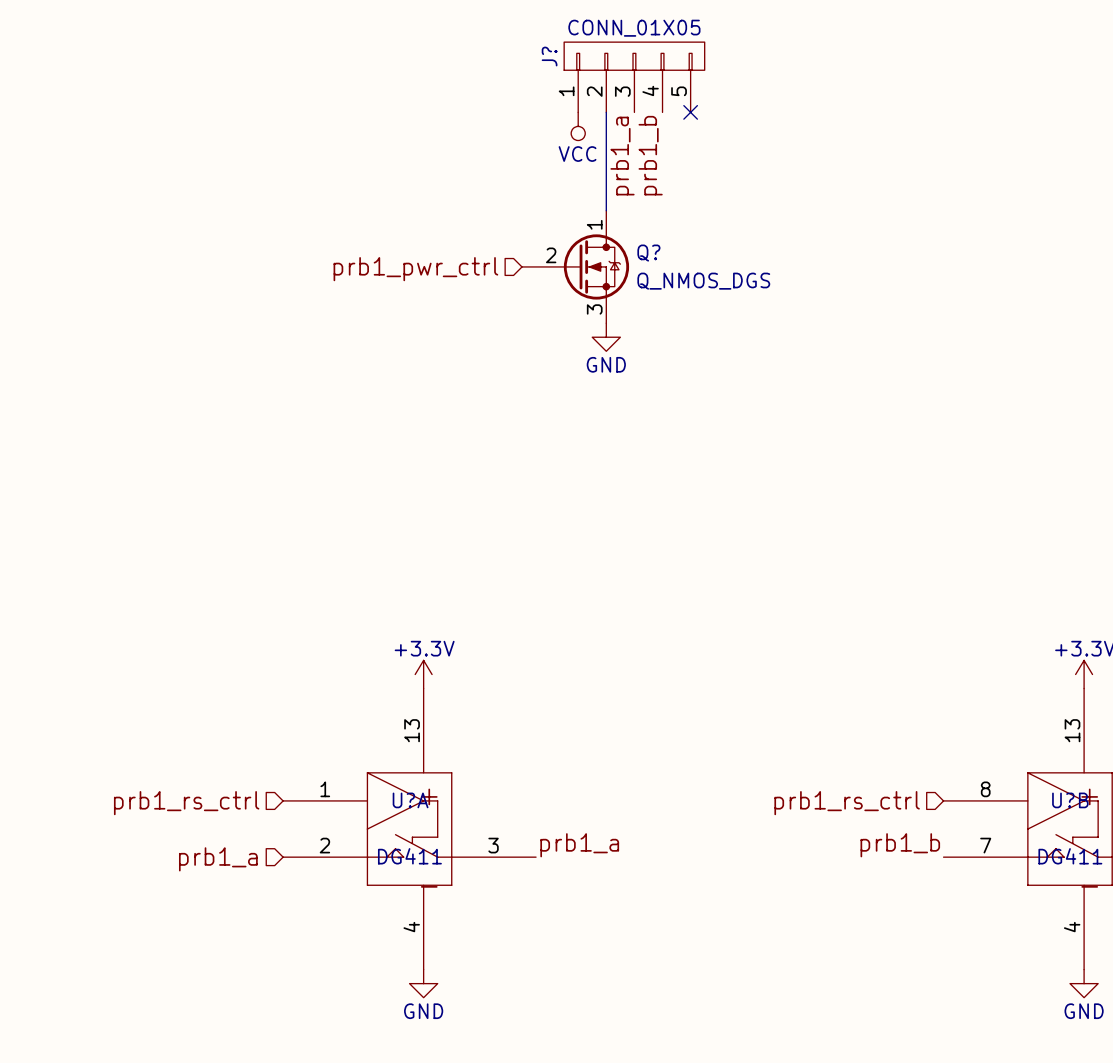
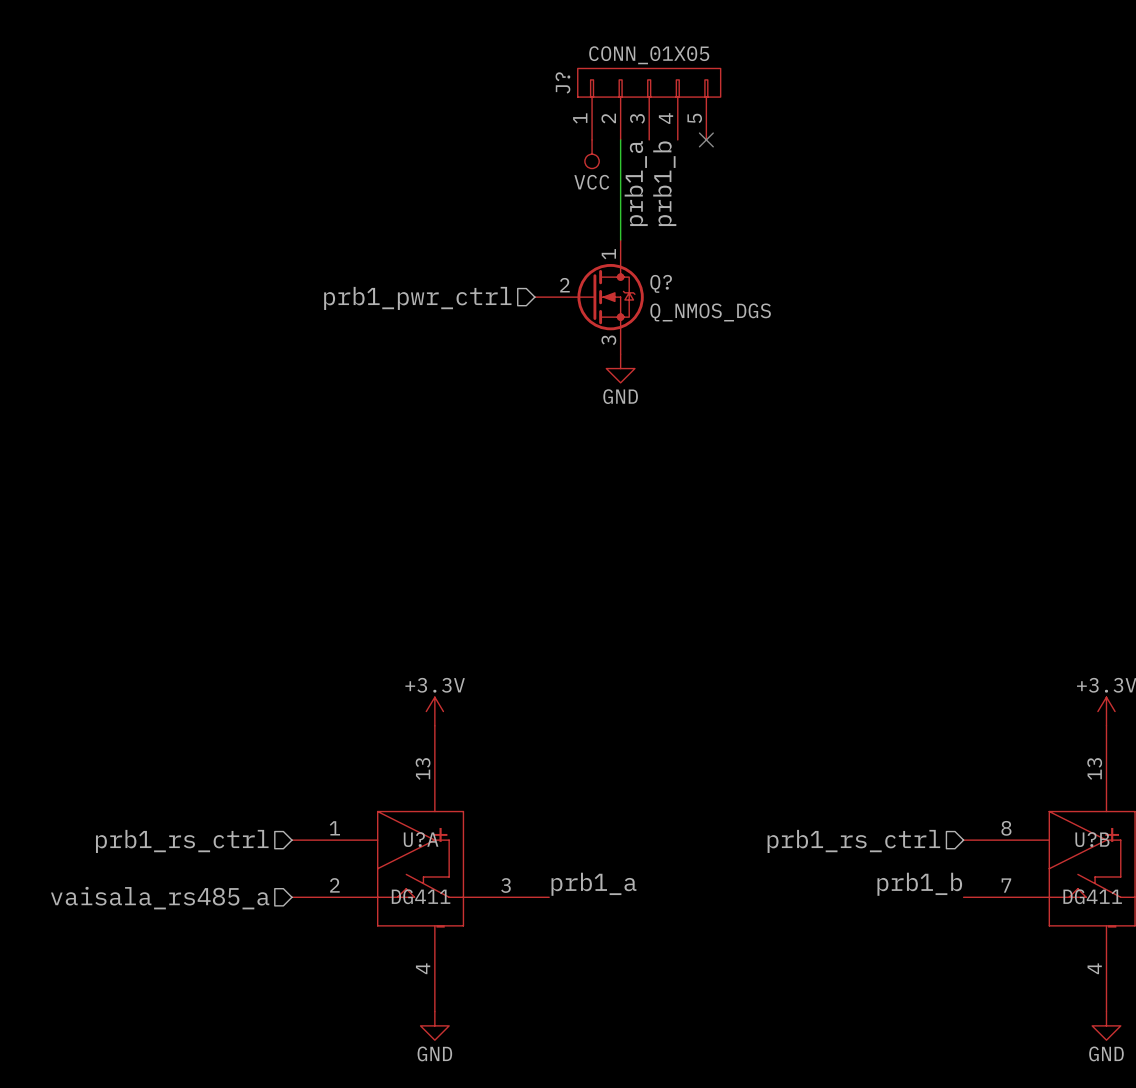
hierarchical label: prb1_a (218, 859) -> vaisala_rs485_a (160, 898)

